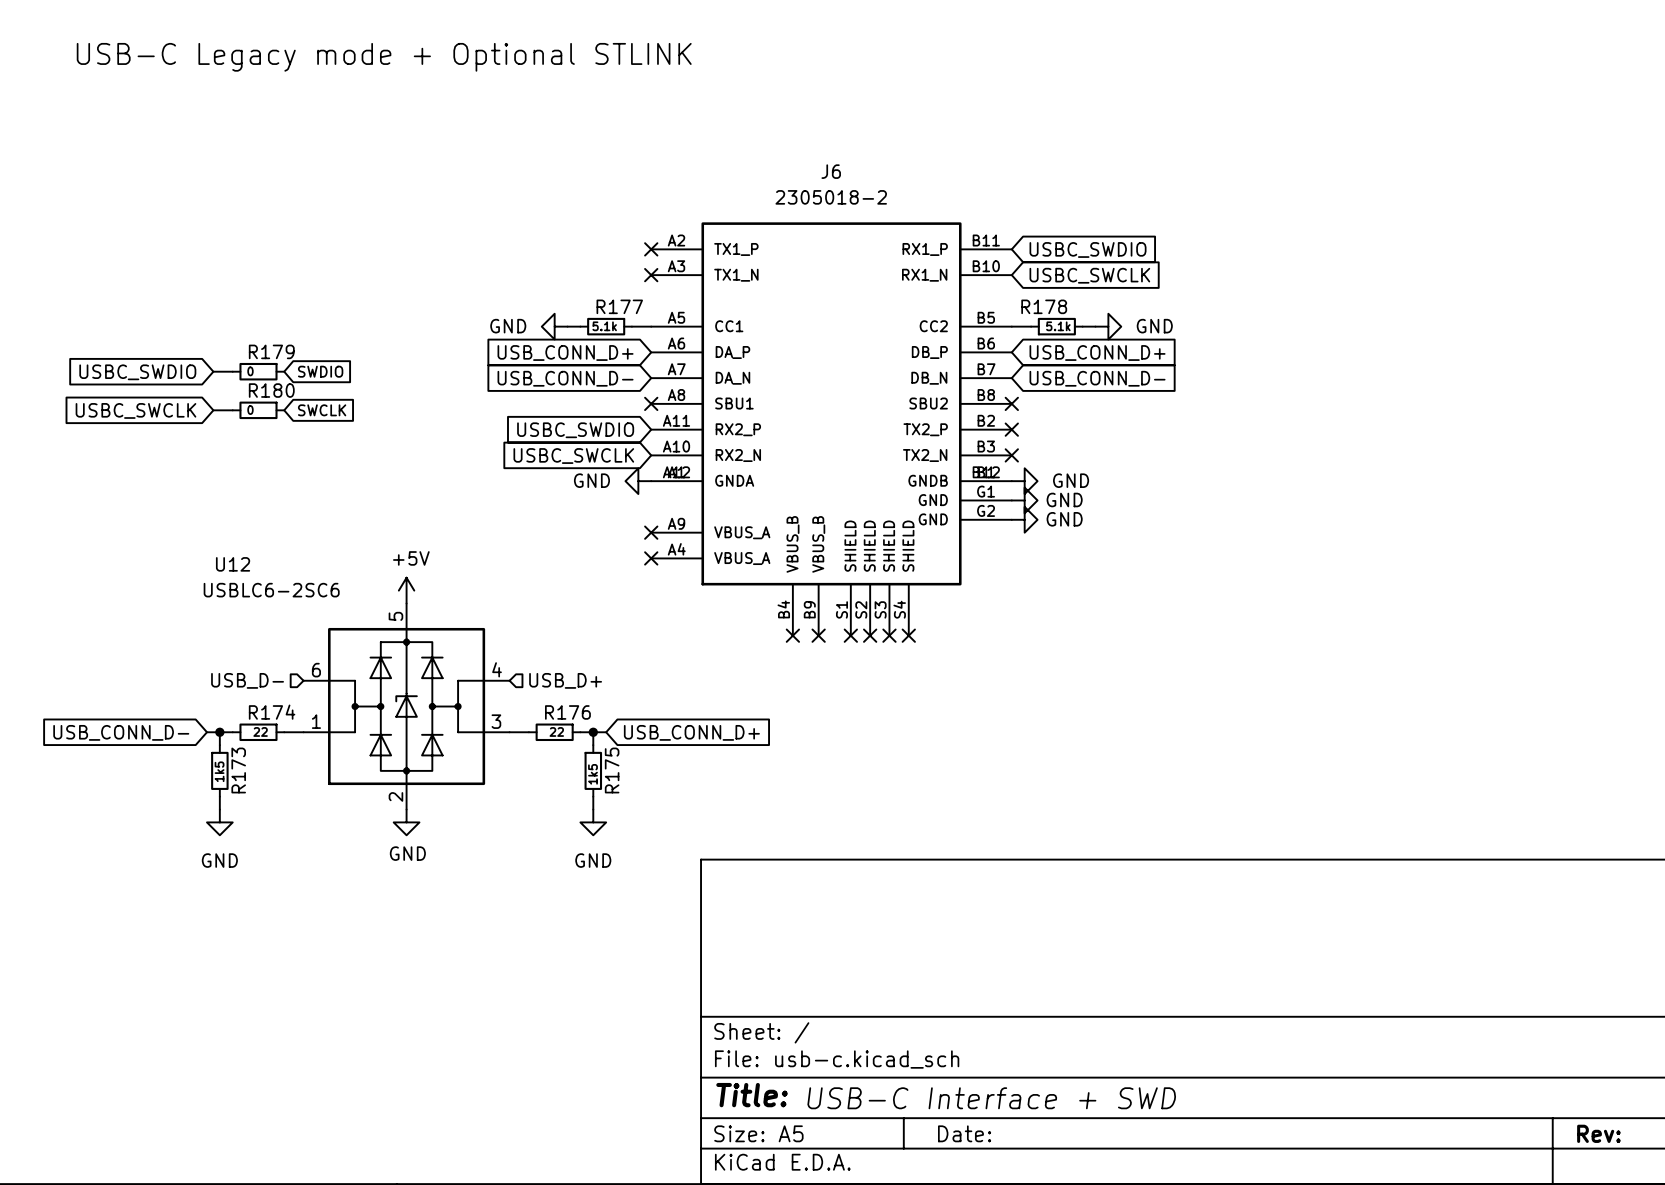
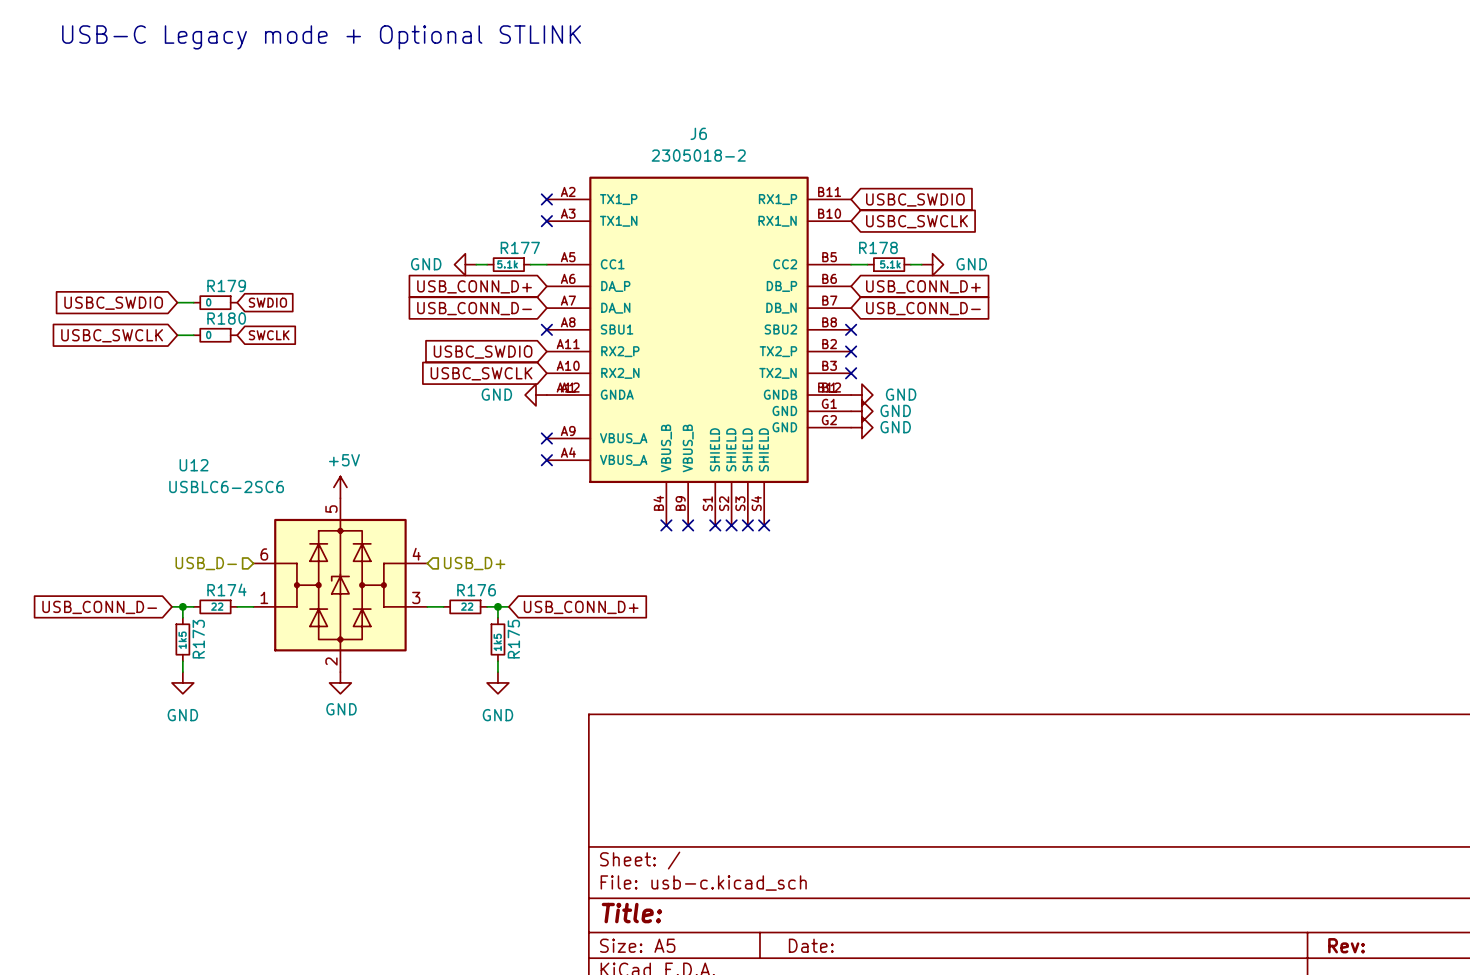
text: USB-C Interface + SWD (991, 1098) -> none

